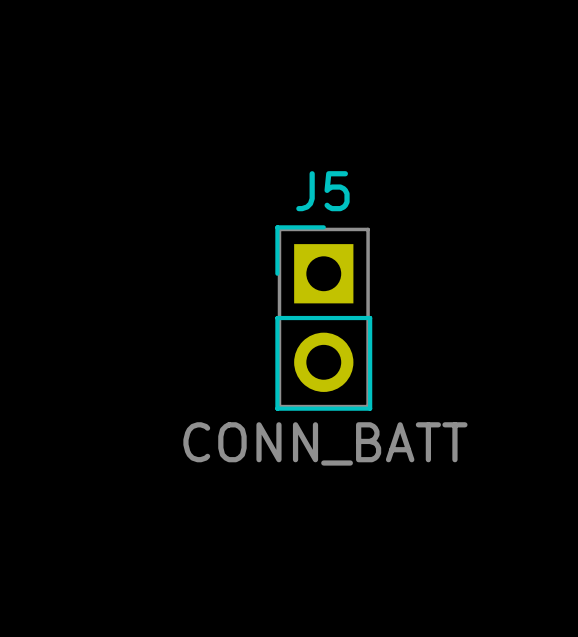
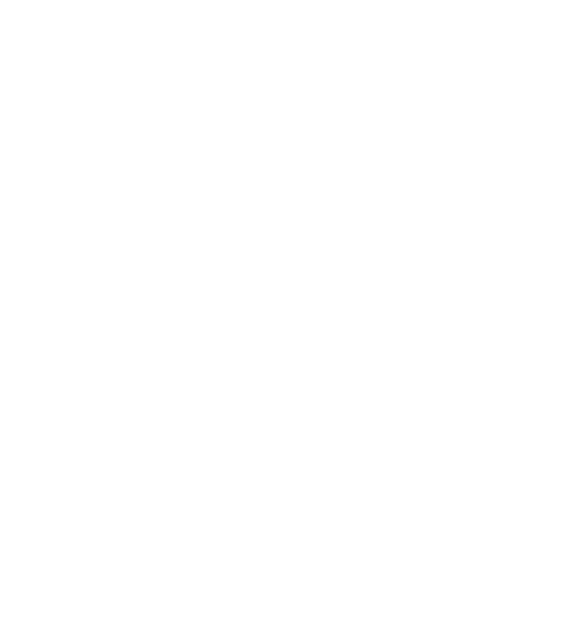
J5: CONN_BATT (323, 318) -> none

